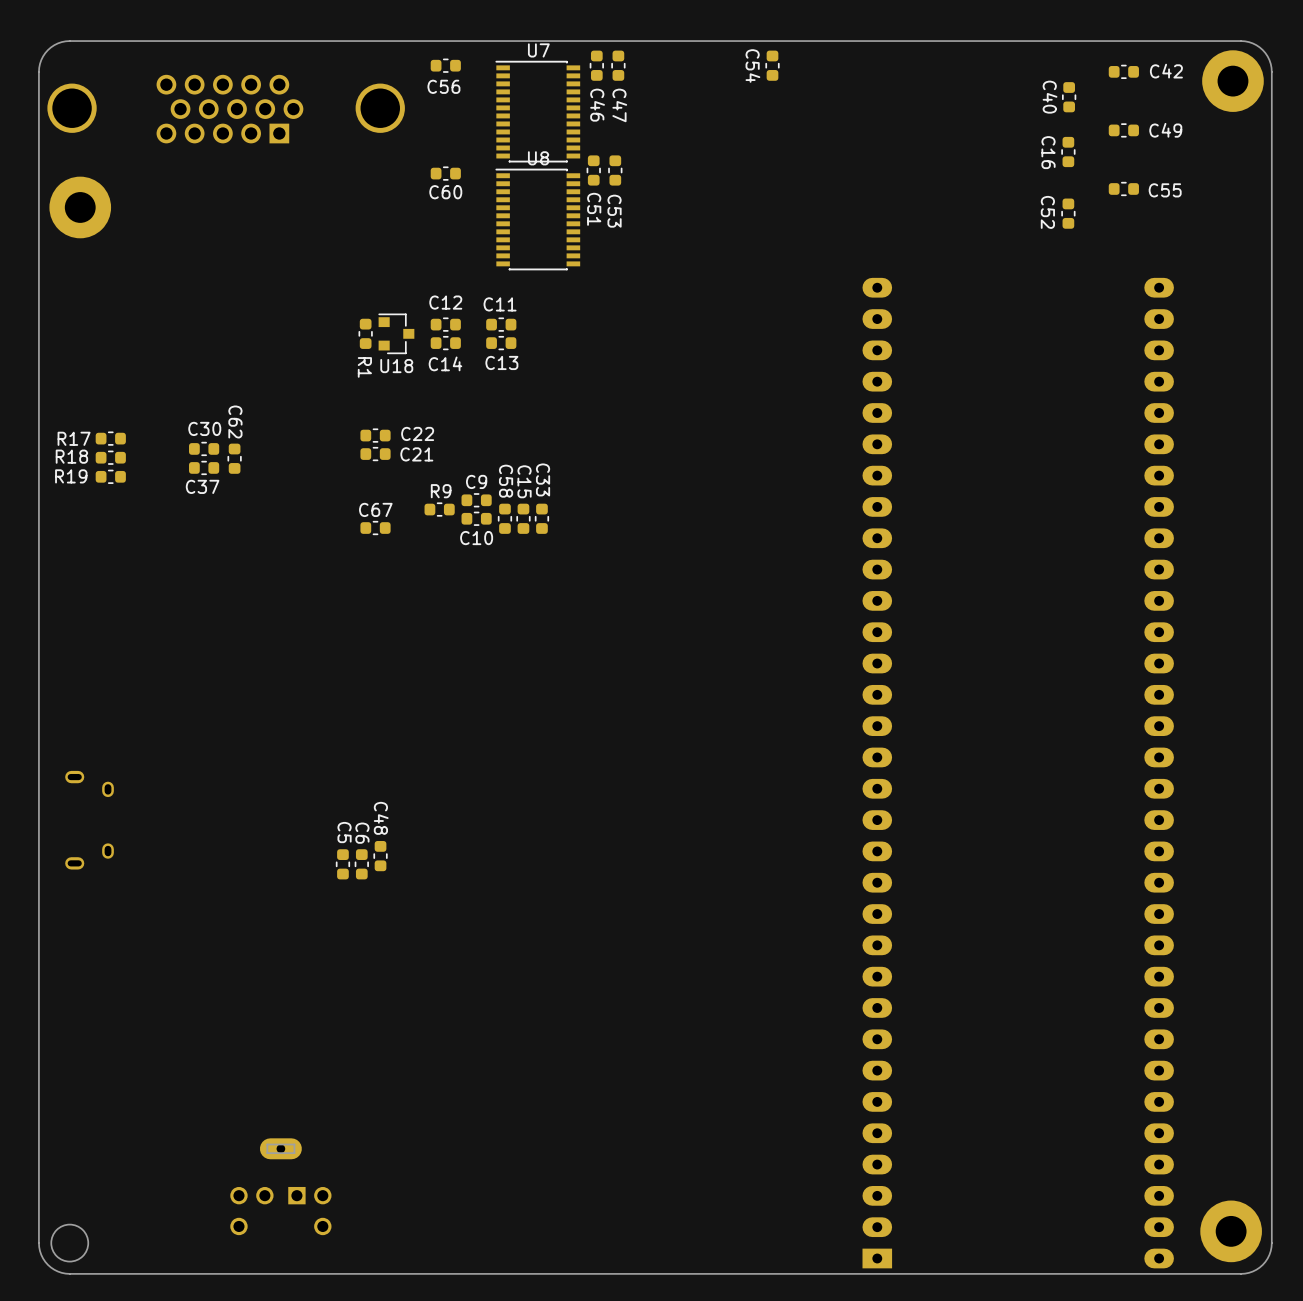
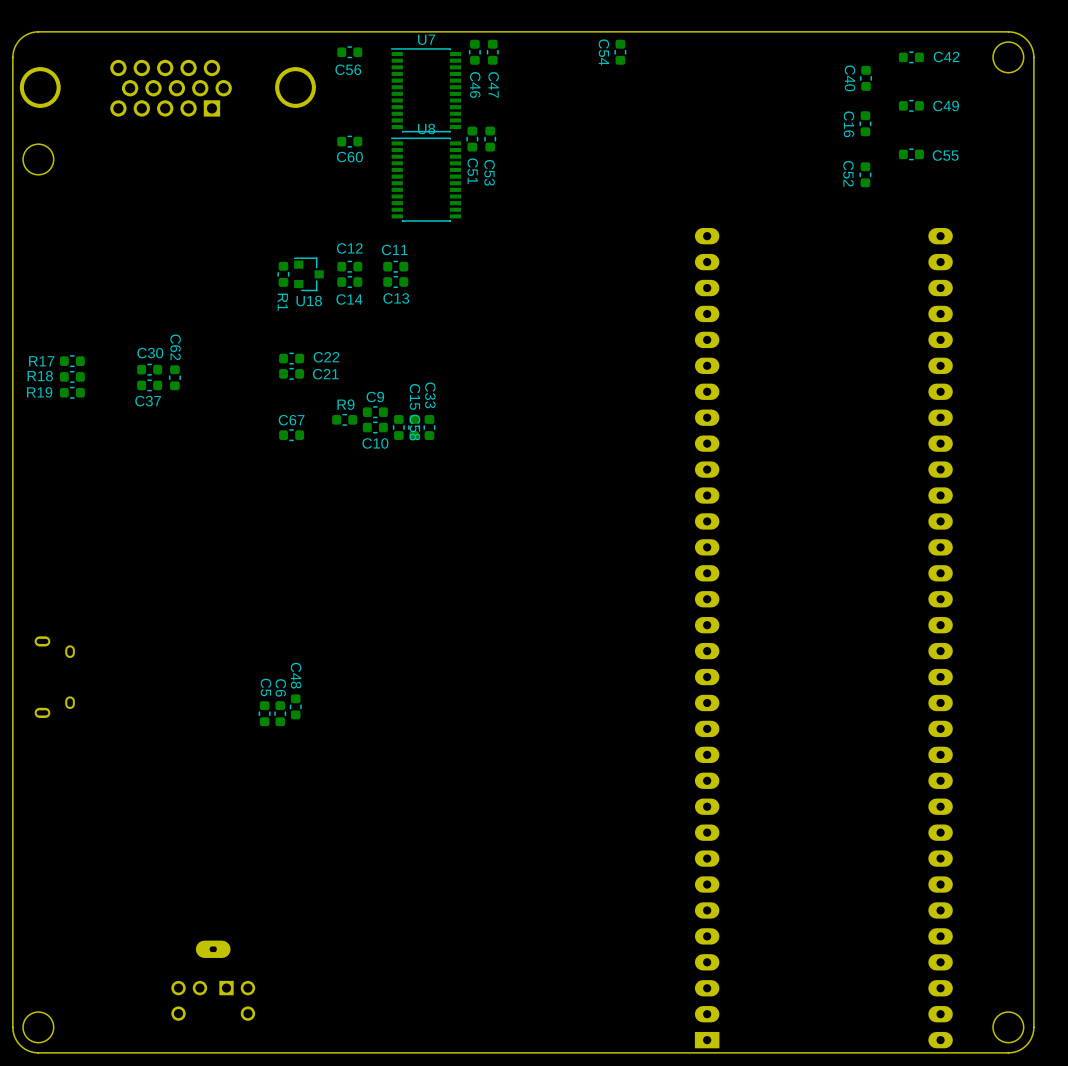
round board edge: none -> [992, 41, 1024, 73]
part: (1232, 81) -> none
round board edge: none -> [22, 143, 54, 176]
part: (80, 207) -> none
C58 name position: C58 (506, 481) -> C58 (415, 427)
round board edge: none -> [992, 1011, 1024, 1043]
part: (1231, 1231) -> none

